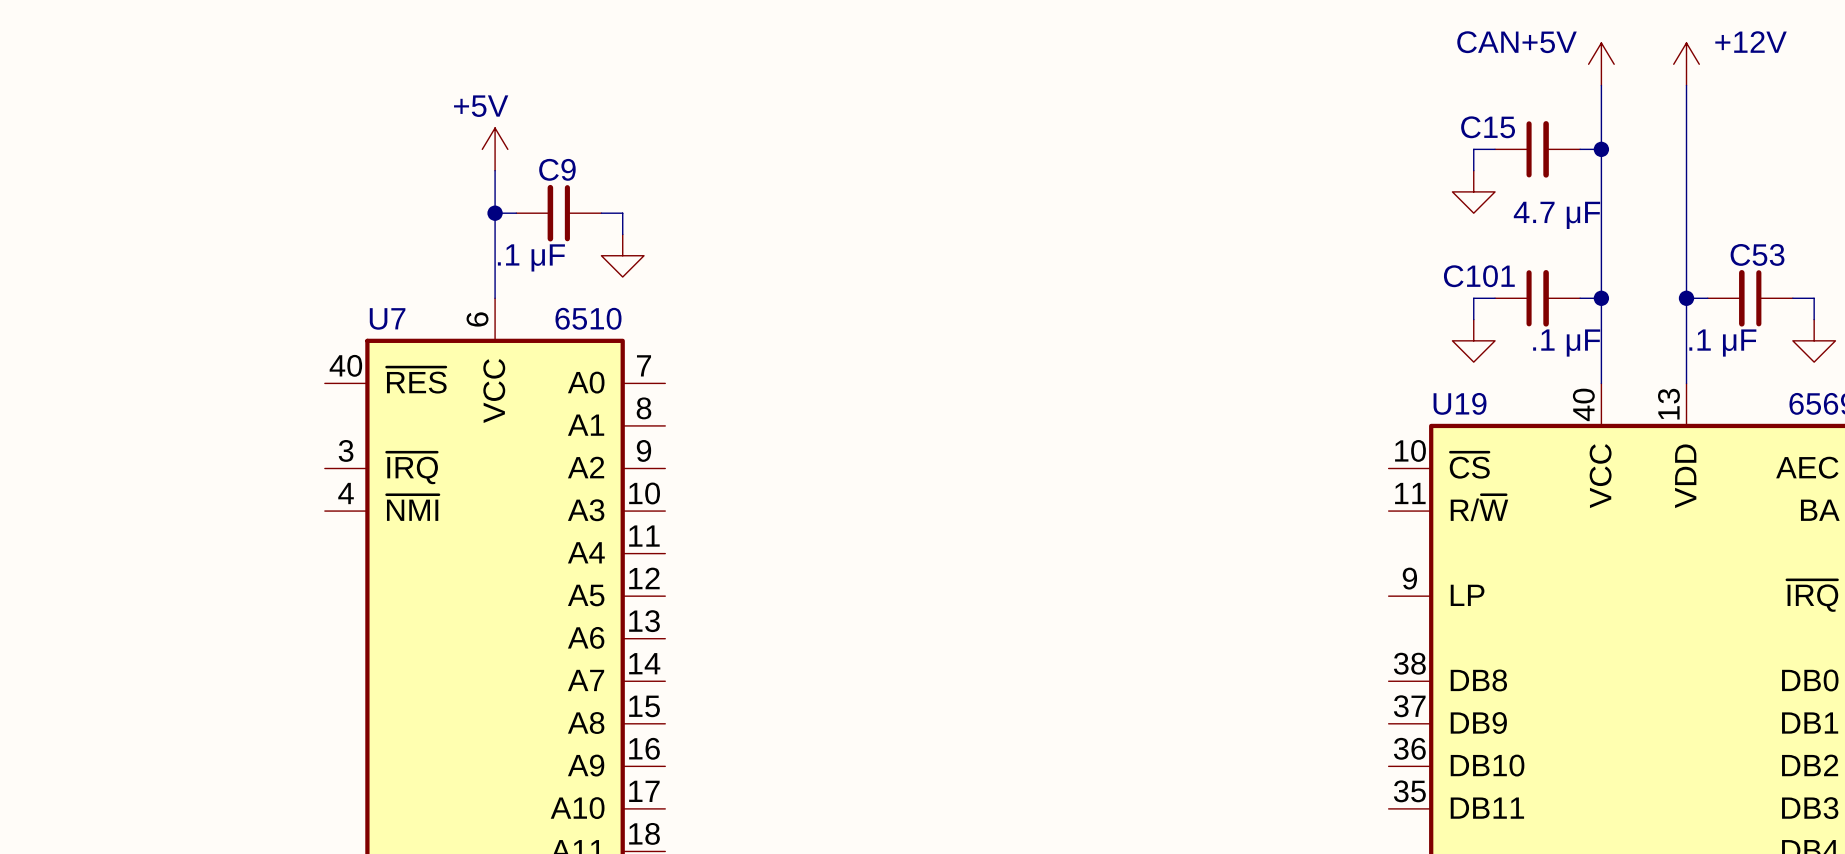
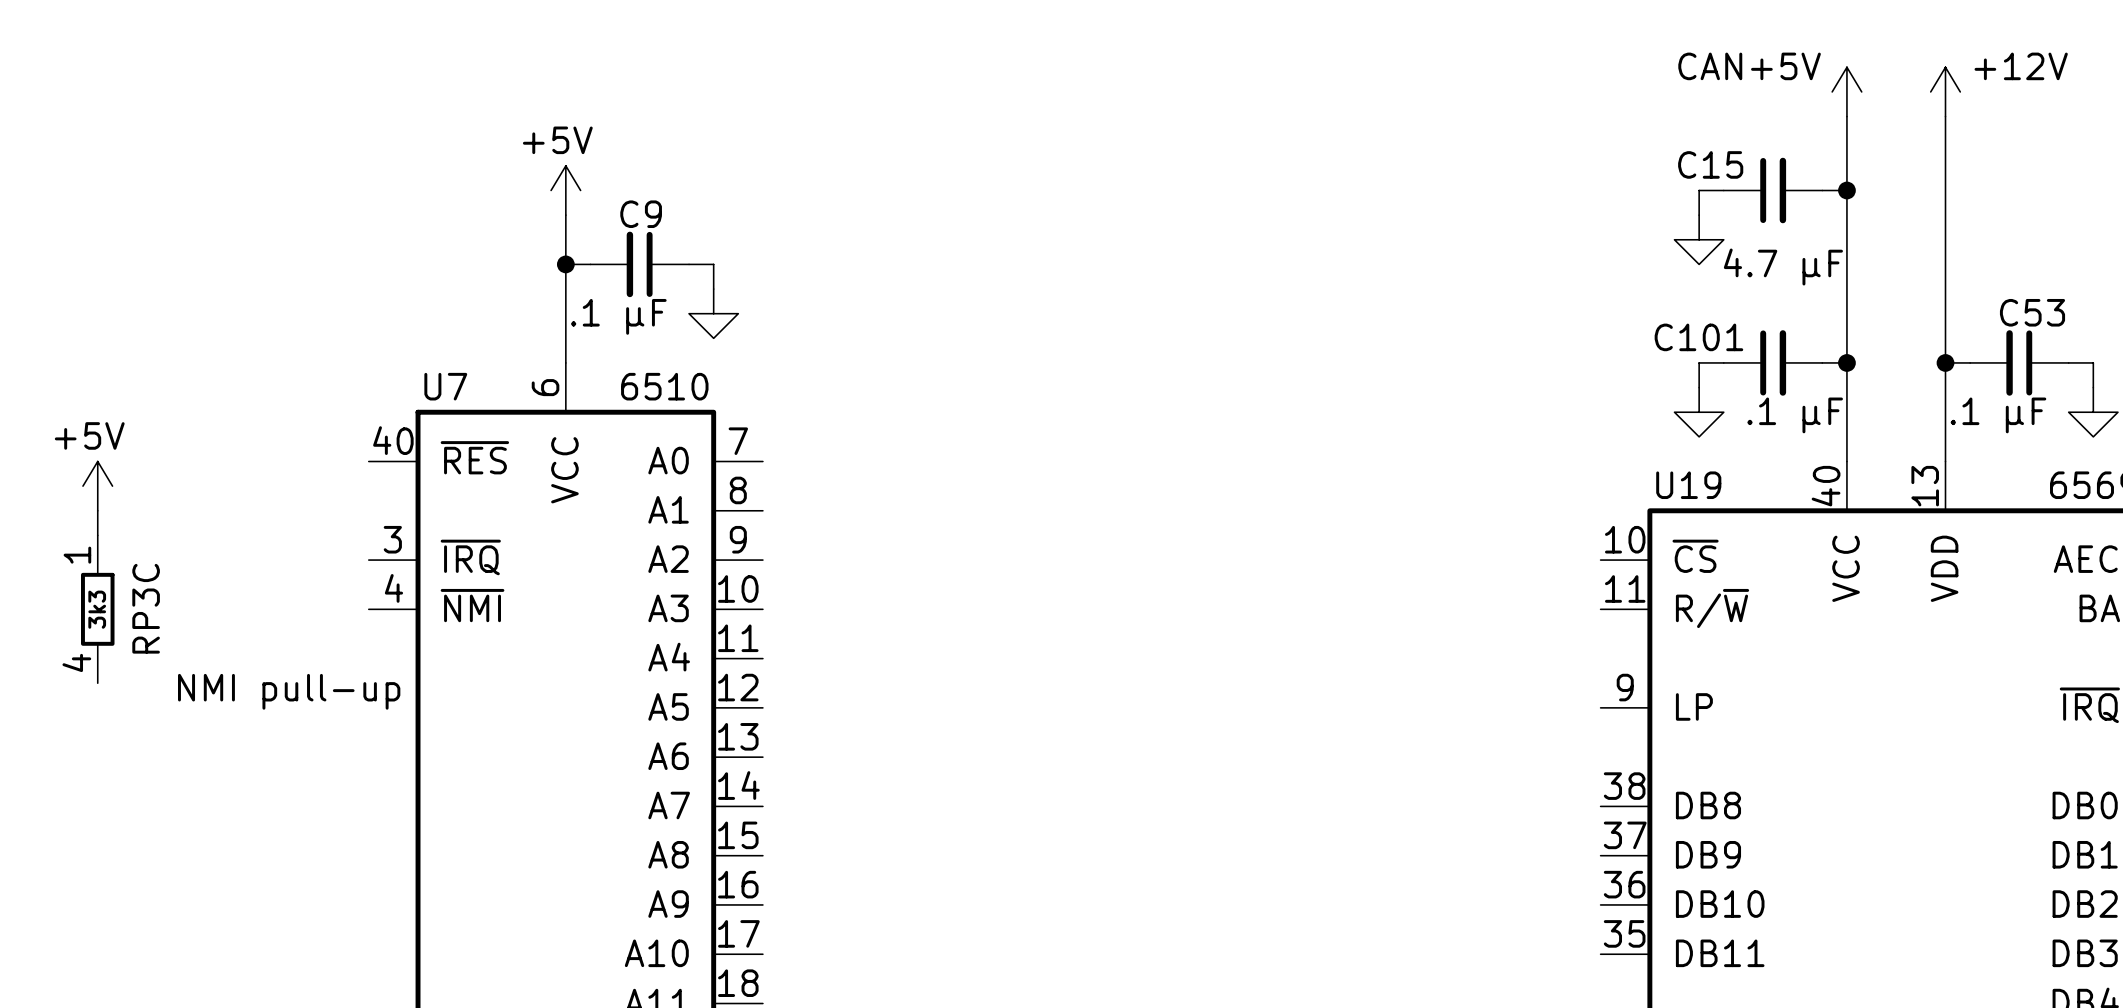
power symbol: none -> +5V (97, 486)
wire: none -> (97, 510) (97, 535)
RP3C: none -> 3k3 (97, 609)
text: none -> NMI pull-up (289, 691)

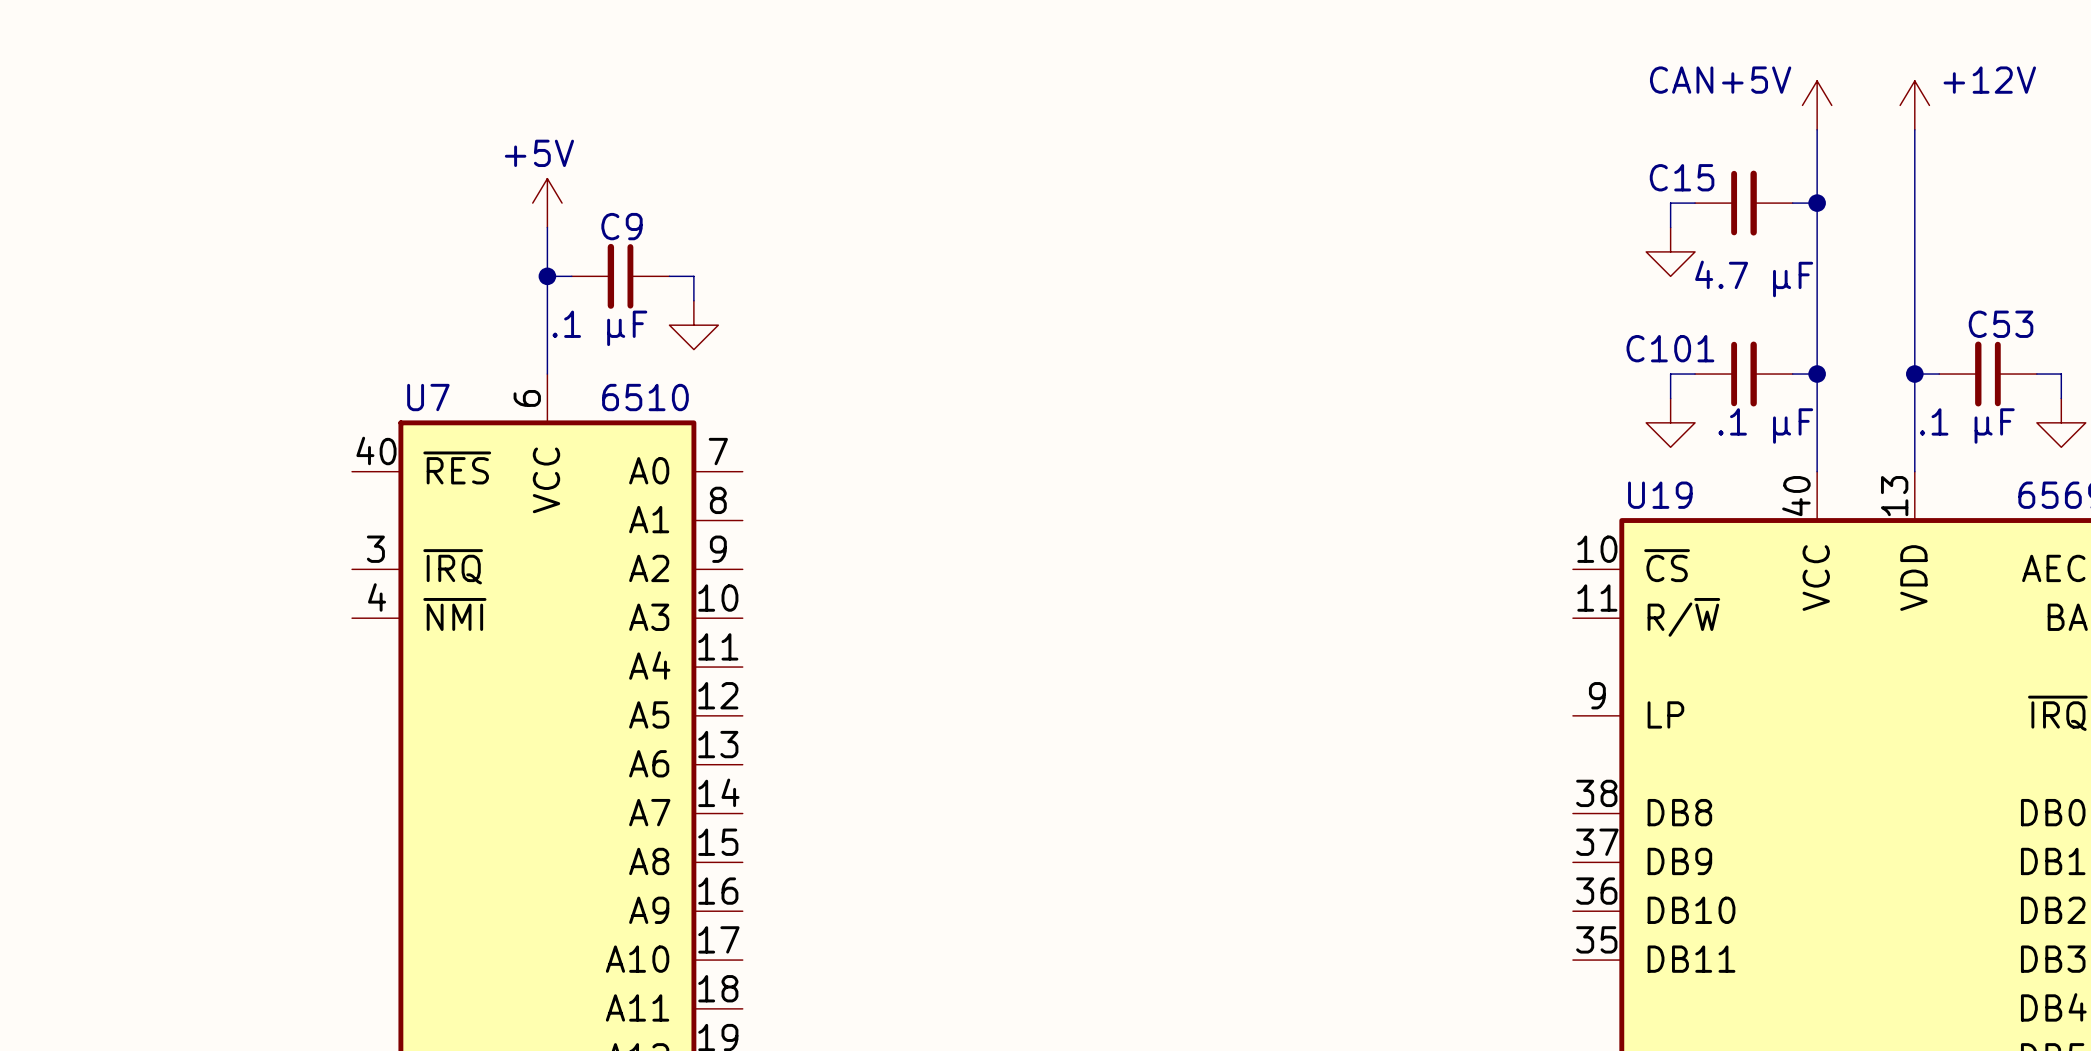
power symbol: +5V (97, 486) -> none
wire: (97, 510) (97, 535) -> none
RP3C: 3k3 (97, 609) -> none
text: NMI pull-up (289, 691) -> none

